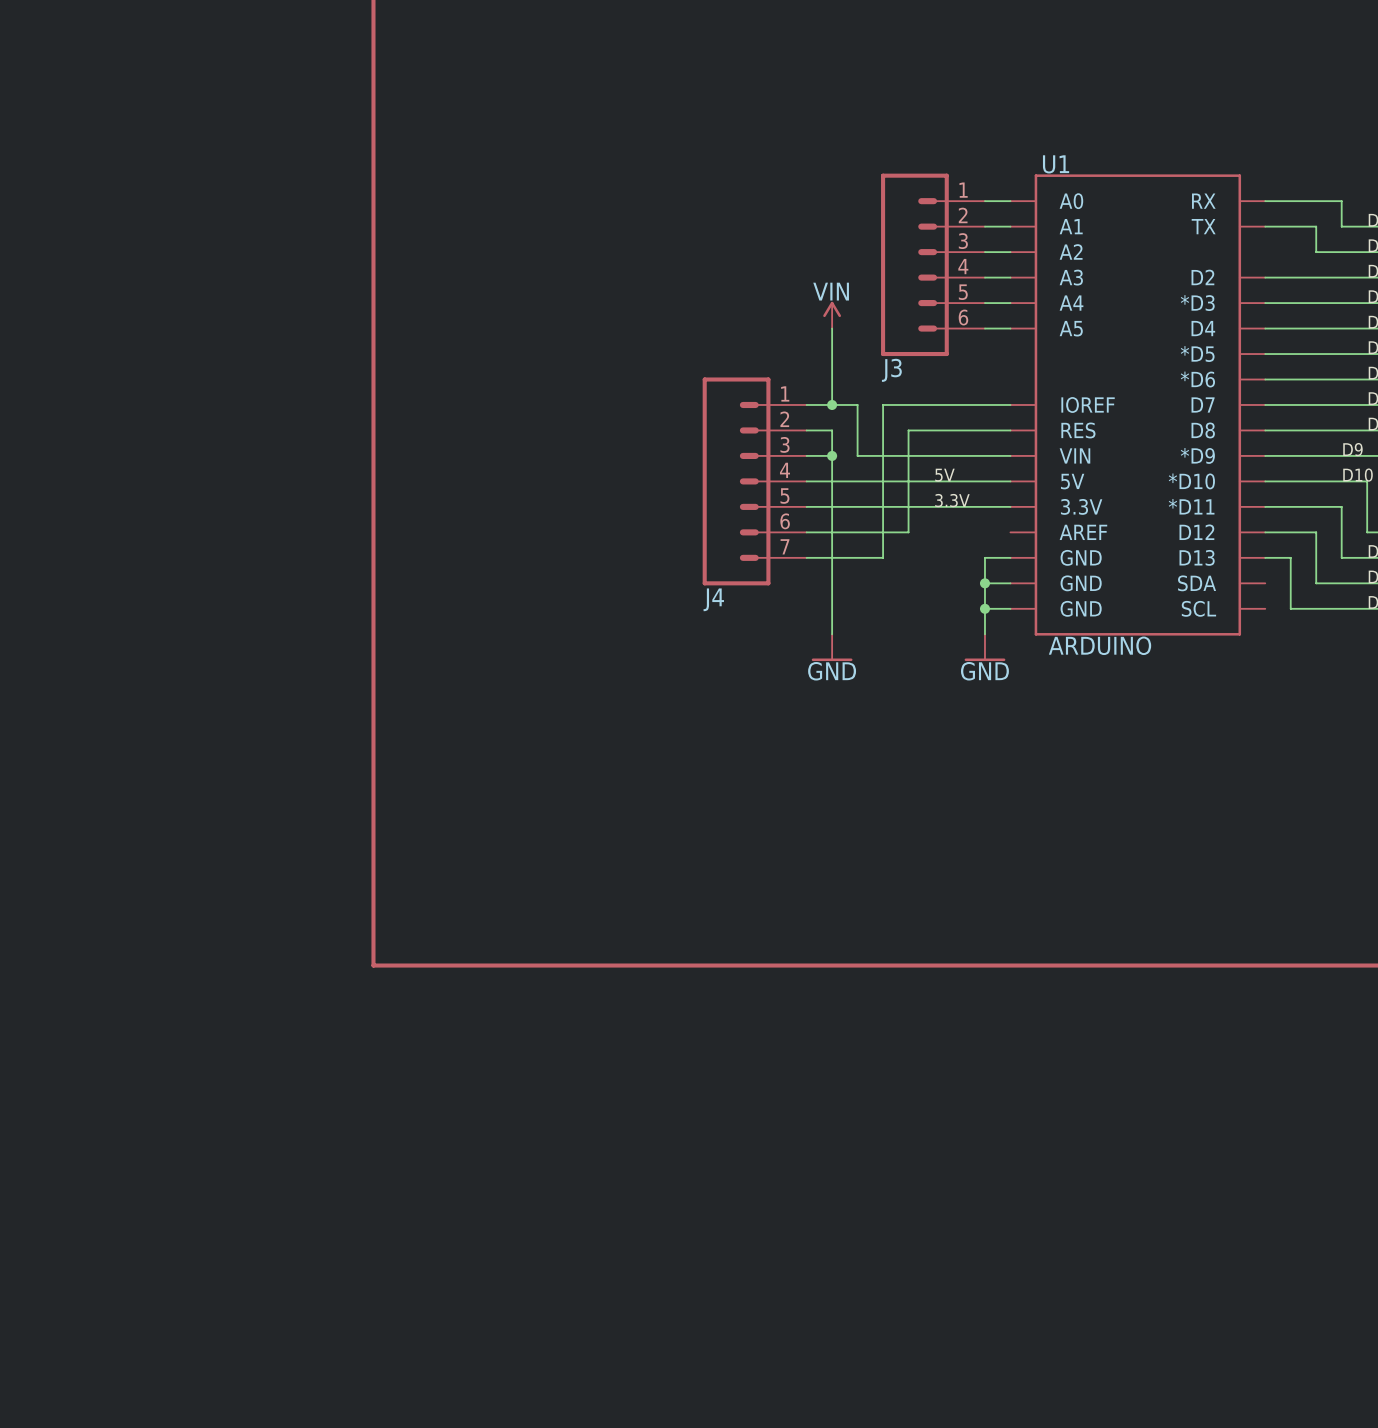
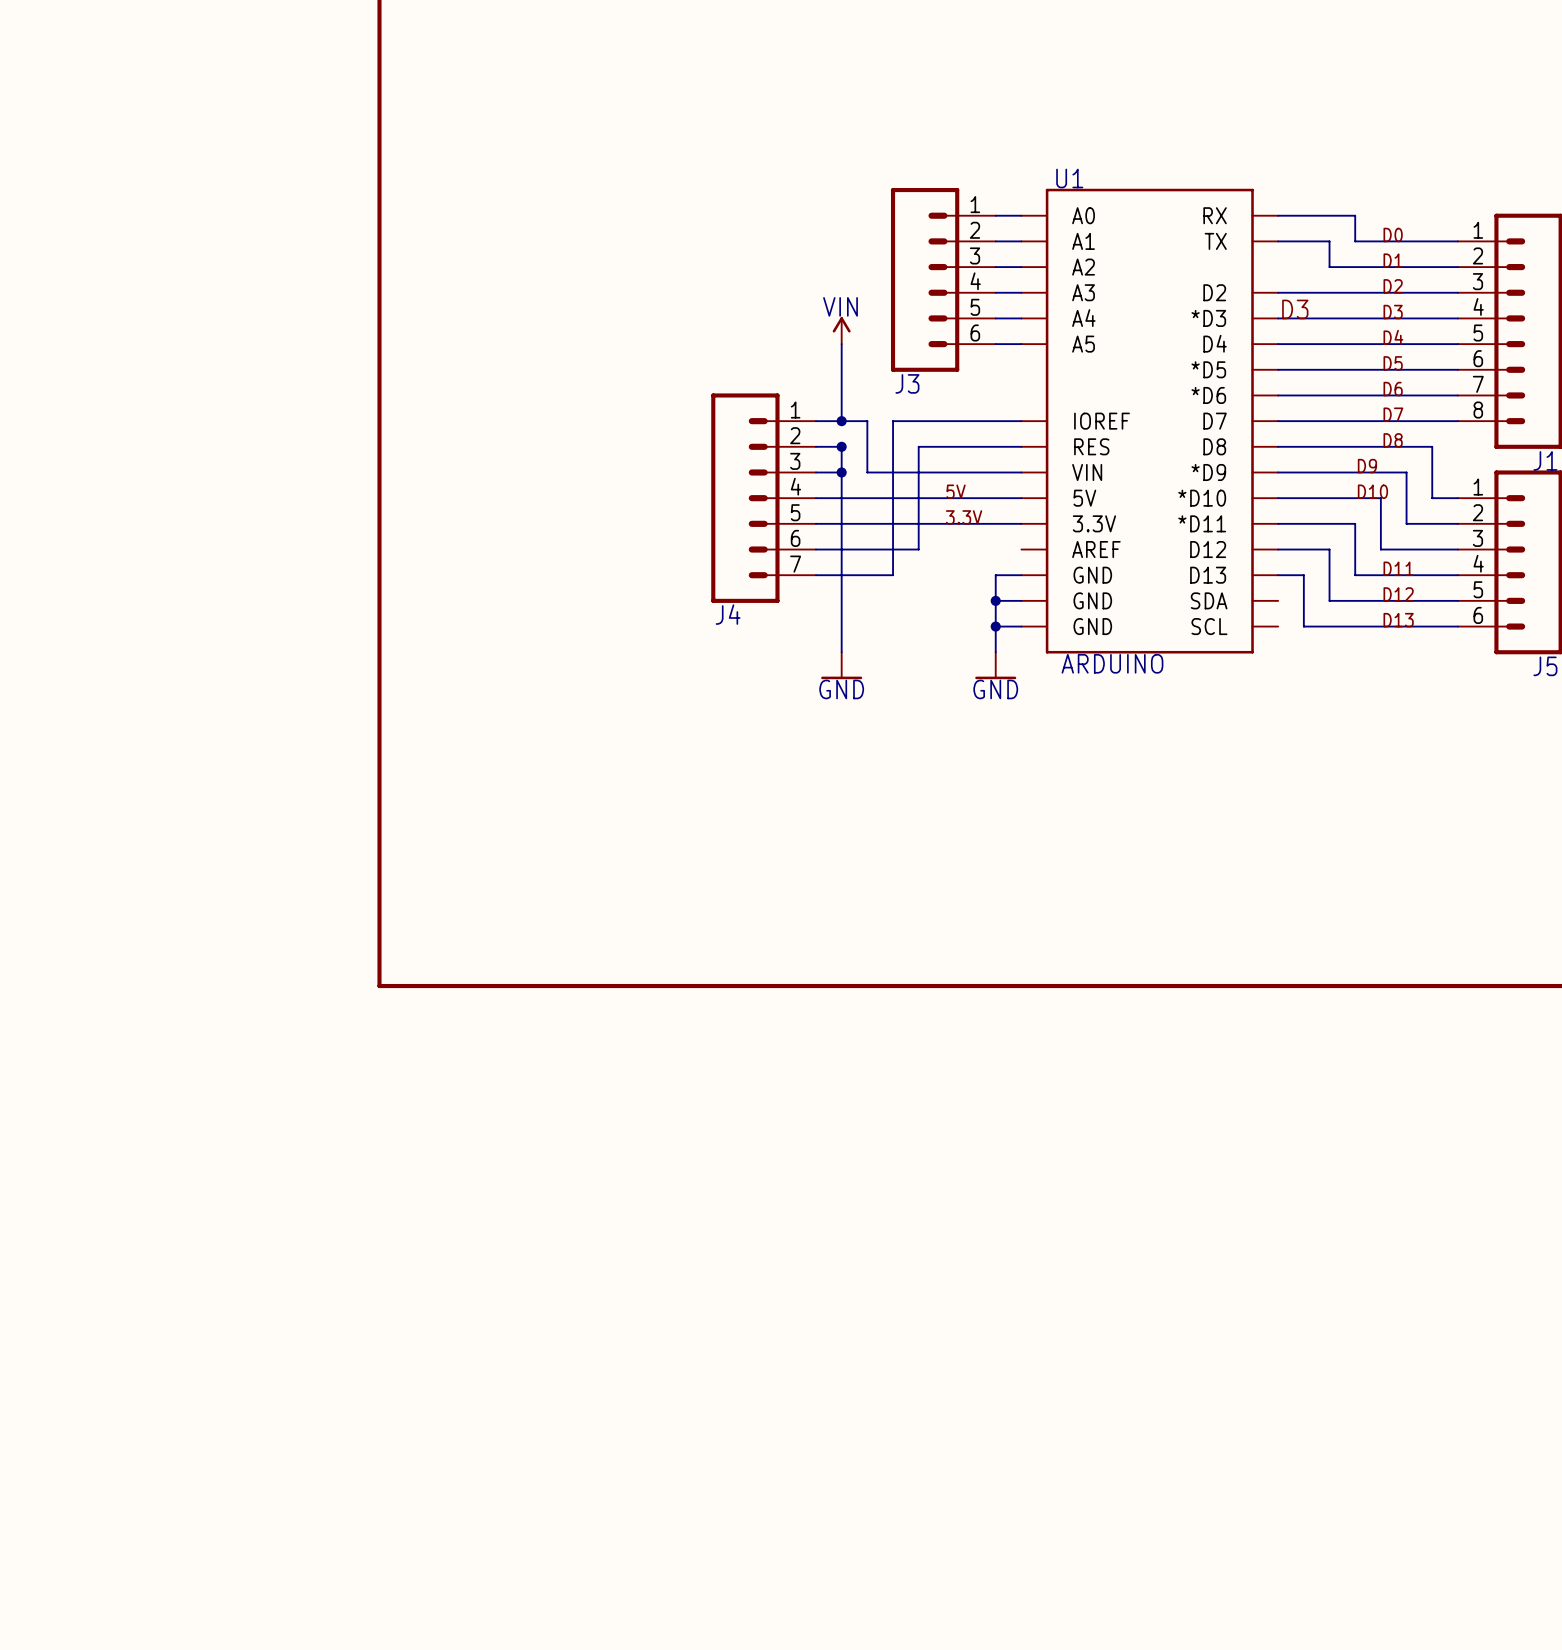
label: none -> D3 (1295, 309)
junction: none -> (841, 446)

